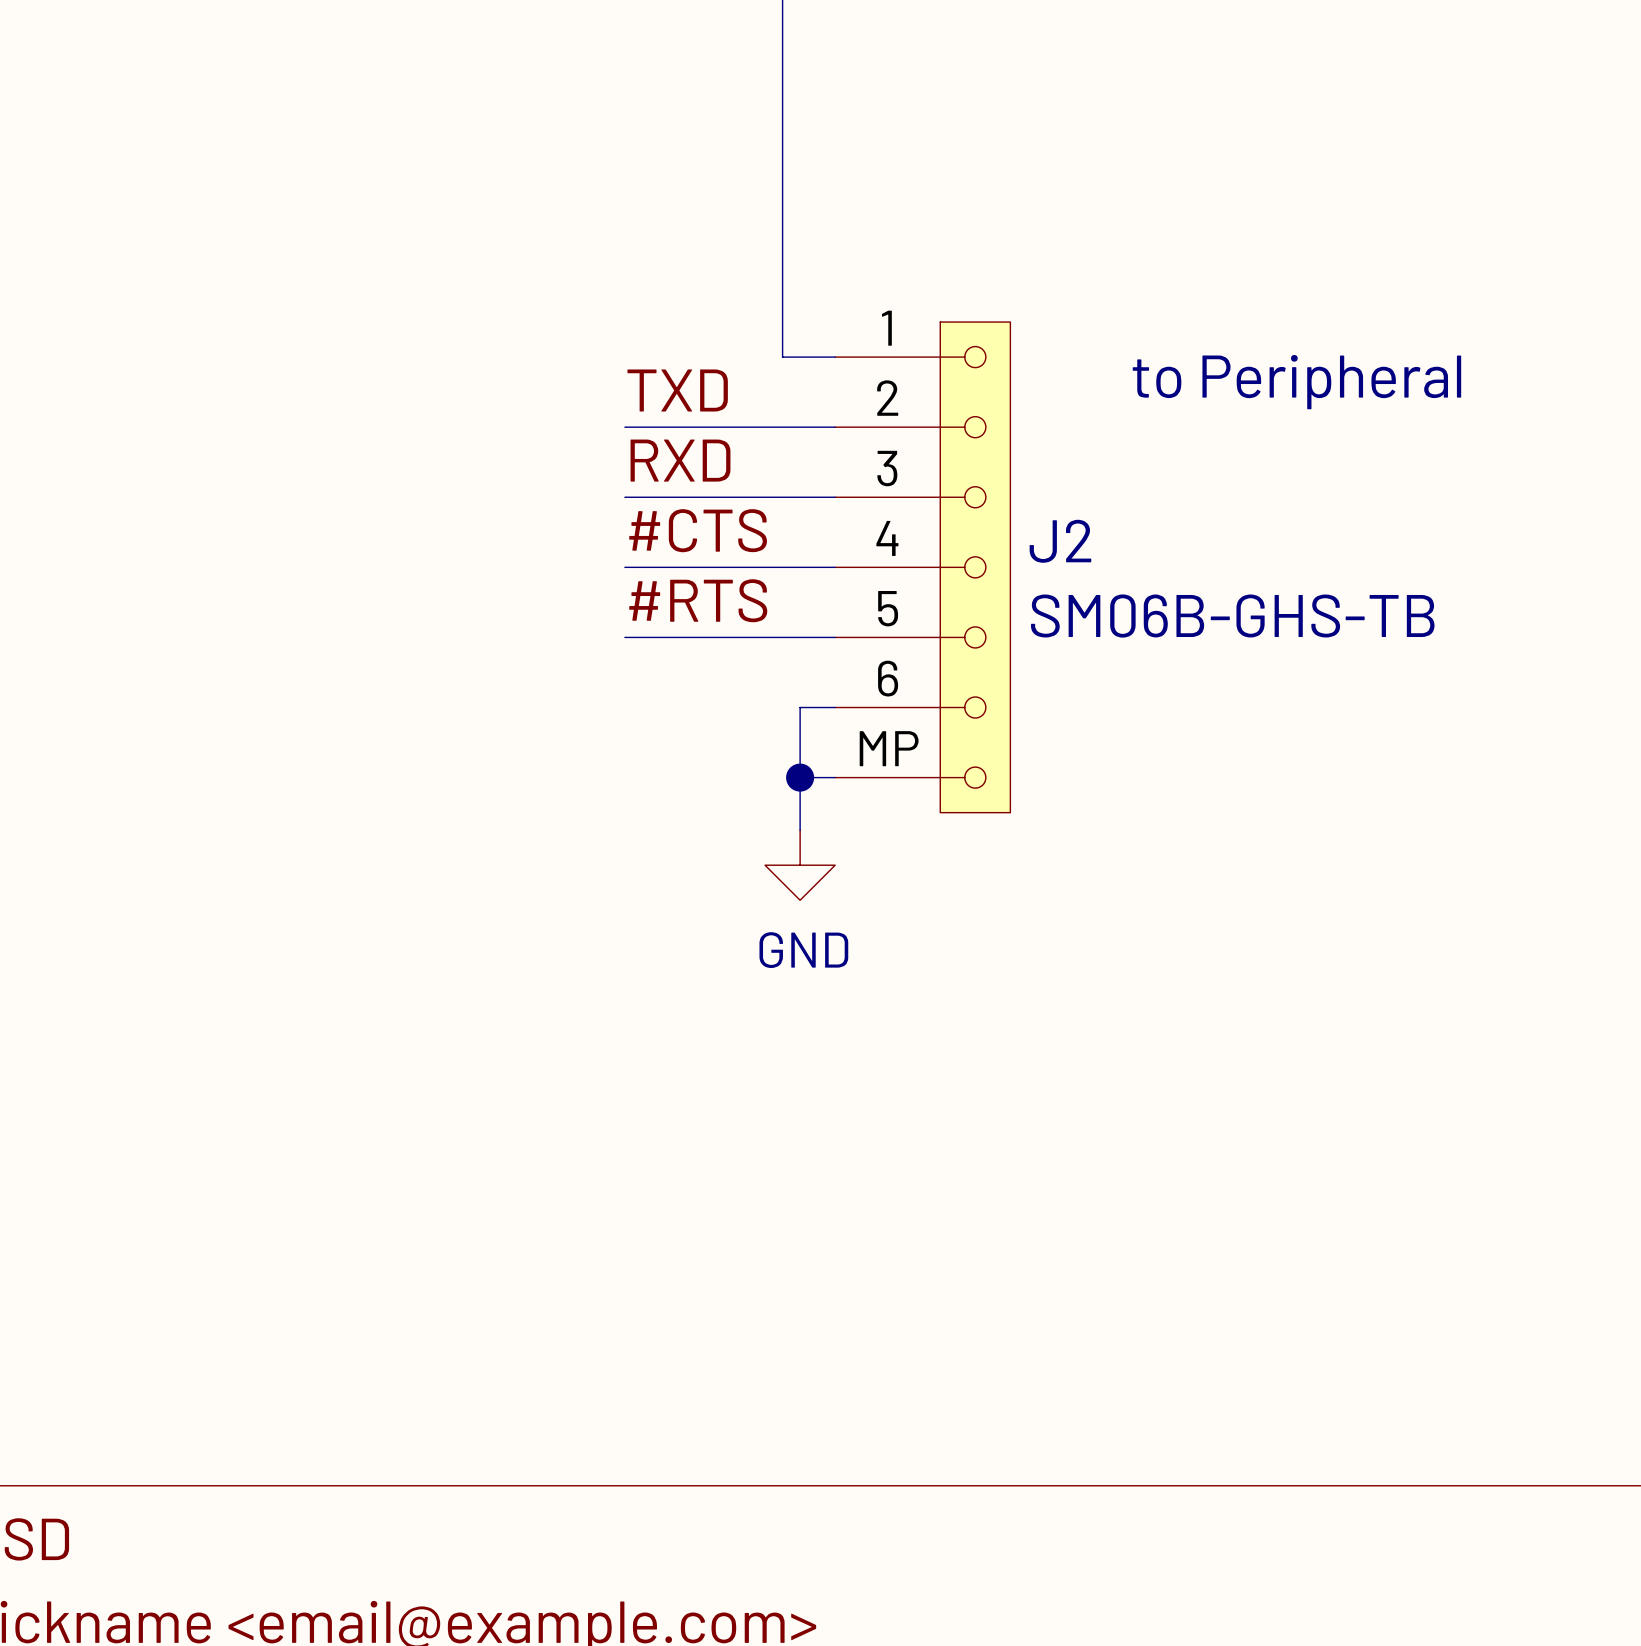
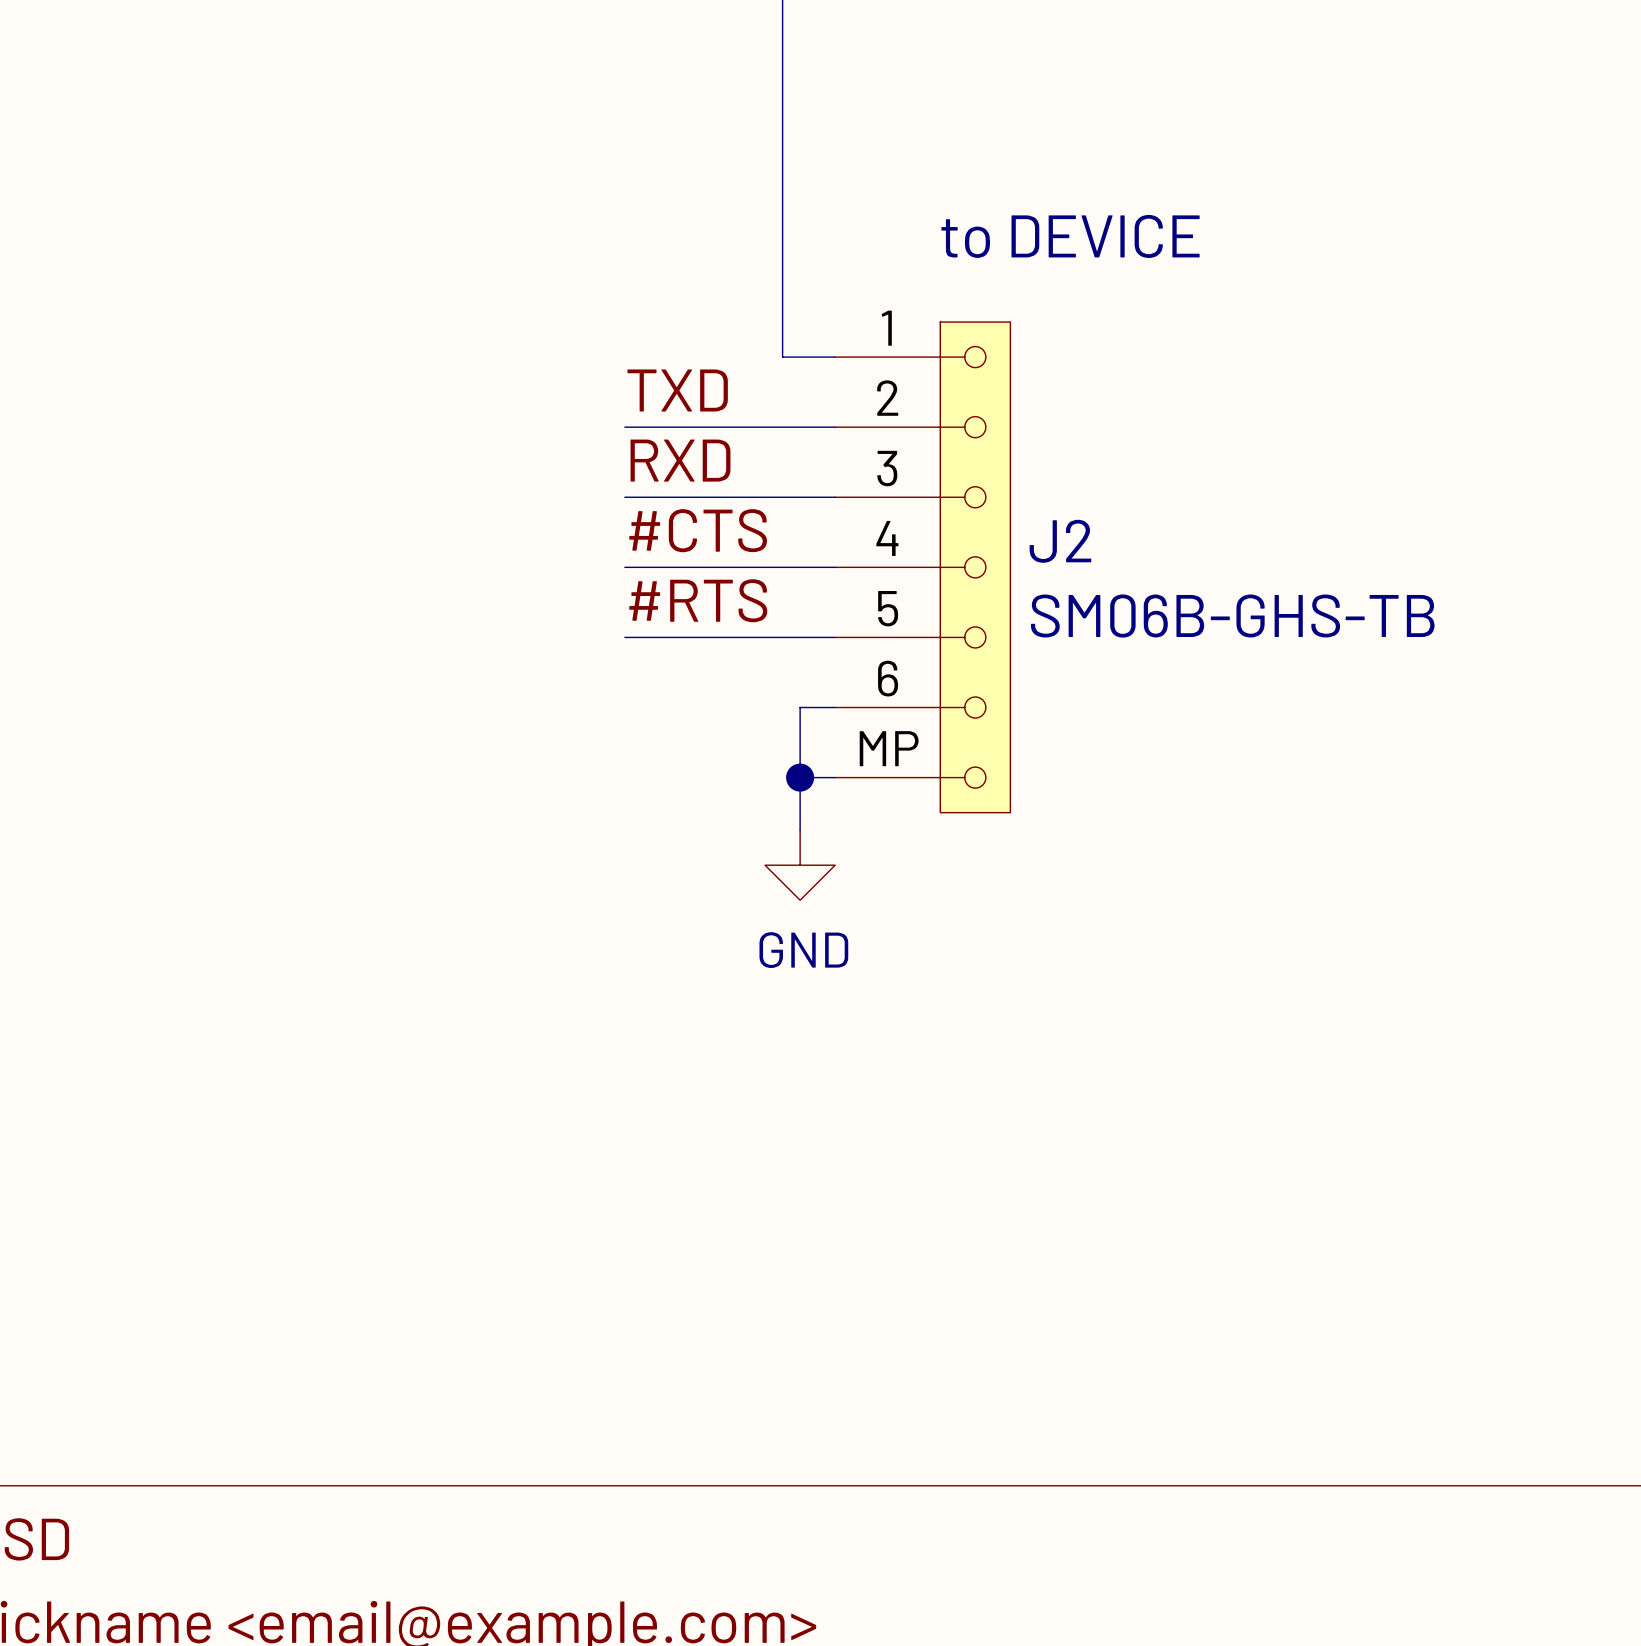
text: none -> to DEVICE (1070, 236)
text: to Peripheral (1296, 382) -> none

